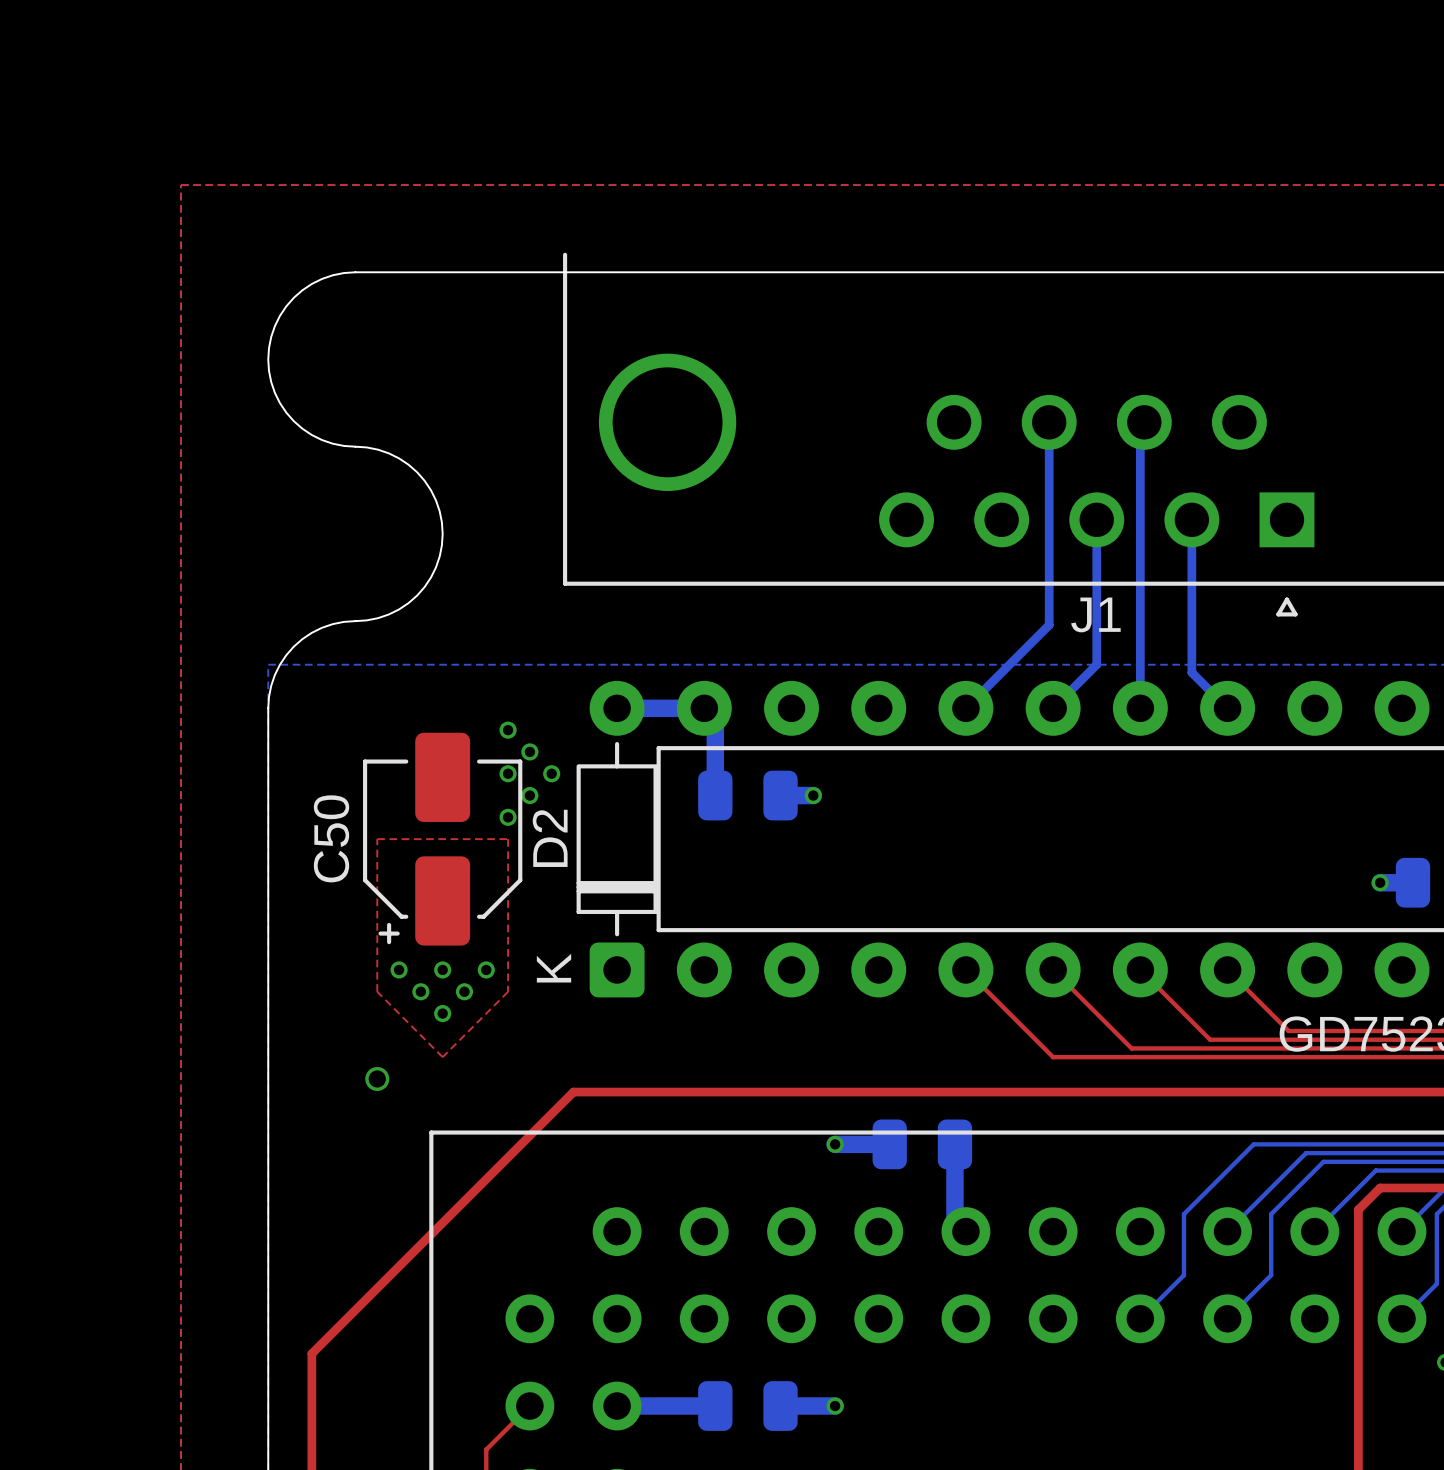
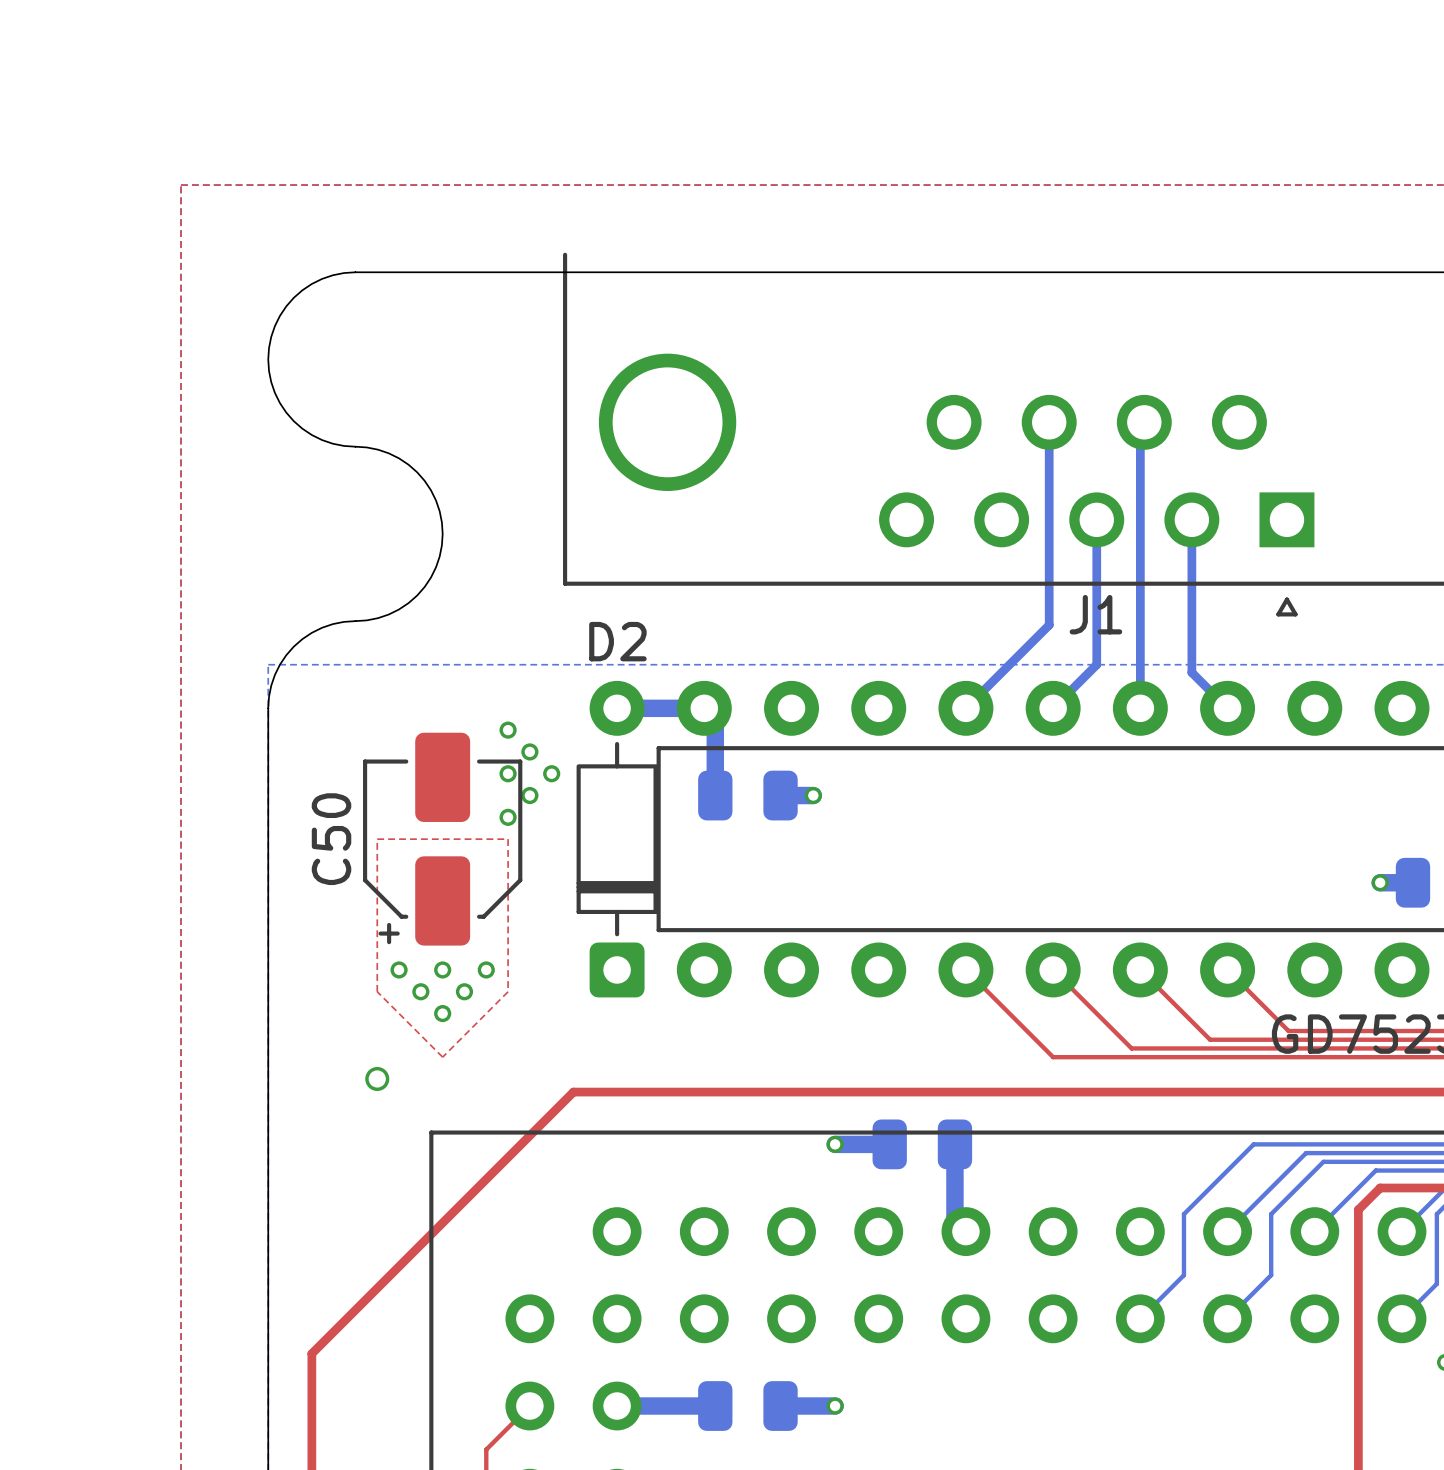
D2 name rotation: 0° (550, 838) -> 90° clockwise (617, 641)
D2 name position: D2 (550, 838) -> D2 (617, 641)
D2 text: K (554, 968) -> none

